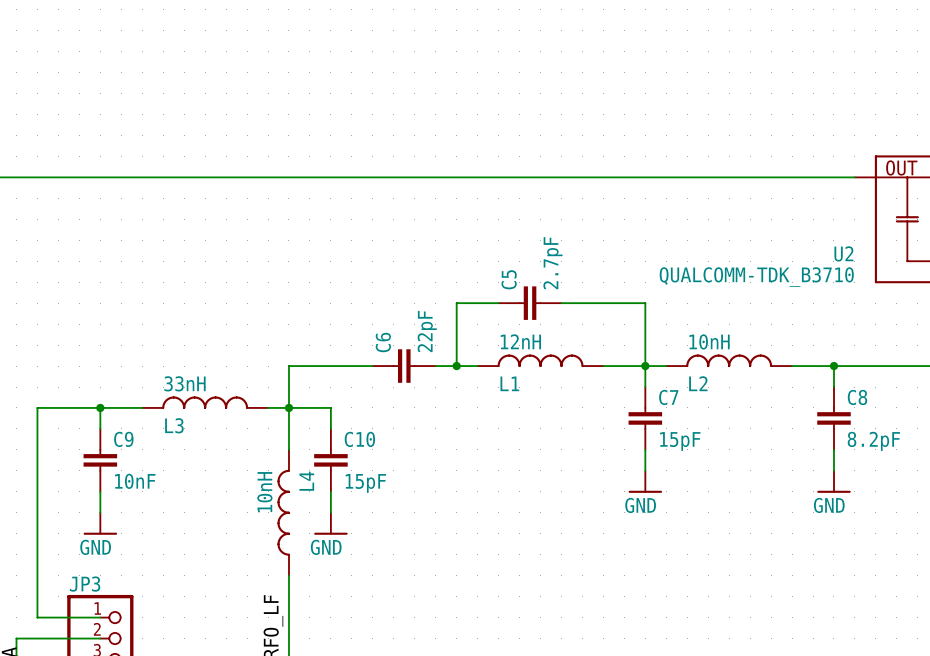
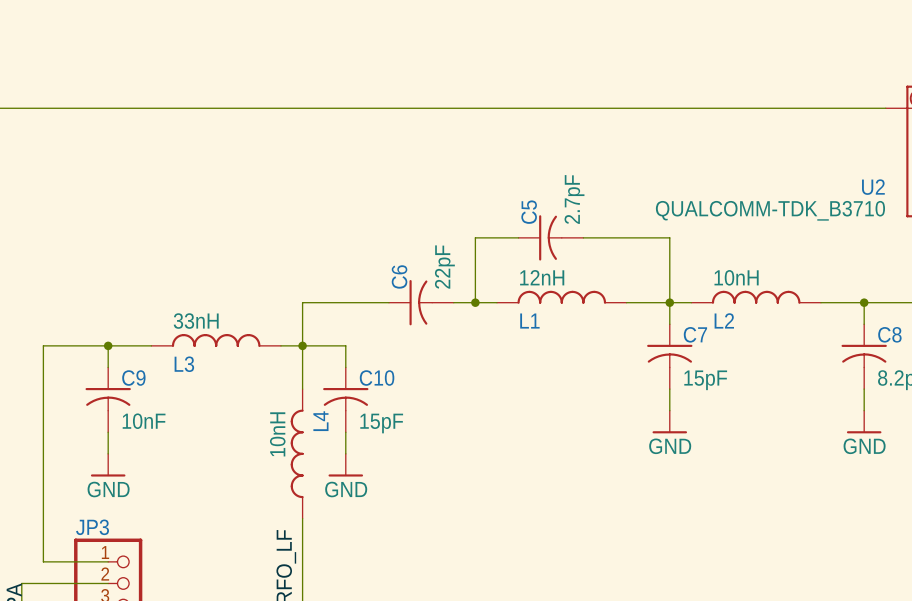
C5 symbol: [498, 286, 562, 320] -> [518, 215, 584, 261]
C6 symbol: [372, 349, 436, 383] -> [388, 280, 454, 326]
C7 symbol: [628, 387, 663, 450] -> [647, 324, 693, 390]
C8 symbol: [817, 387, 851, 450] -> [841, 324, 887, 390]
C9 symbol: [83, 428, 118, 492] -> [85, 367, 131, 433]
C10 symbol: [314, 428, 348, 492] -> [323, 367, 369, 433]

